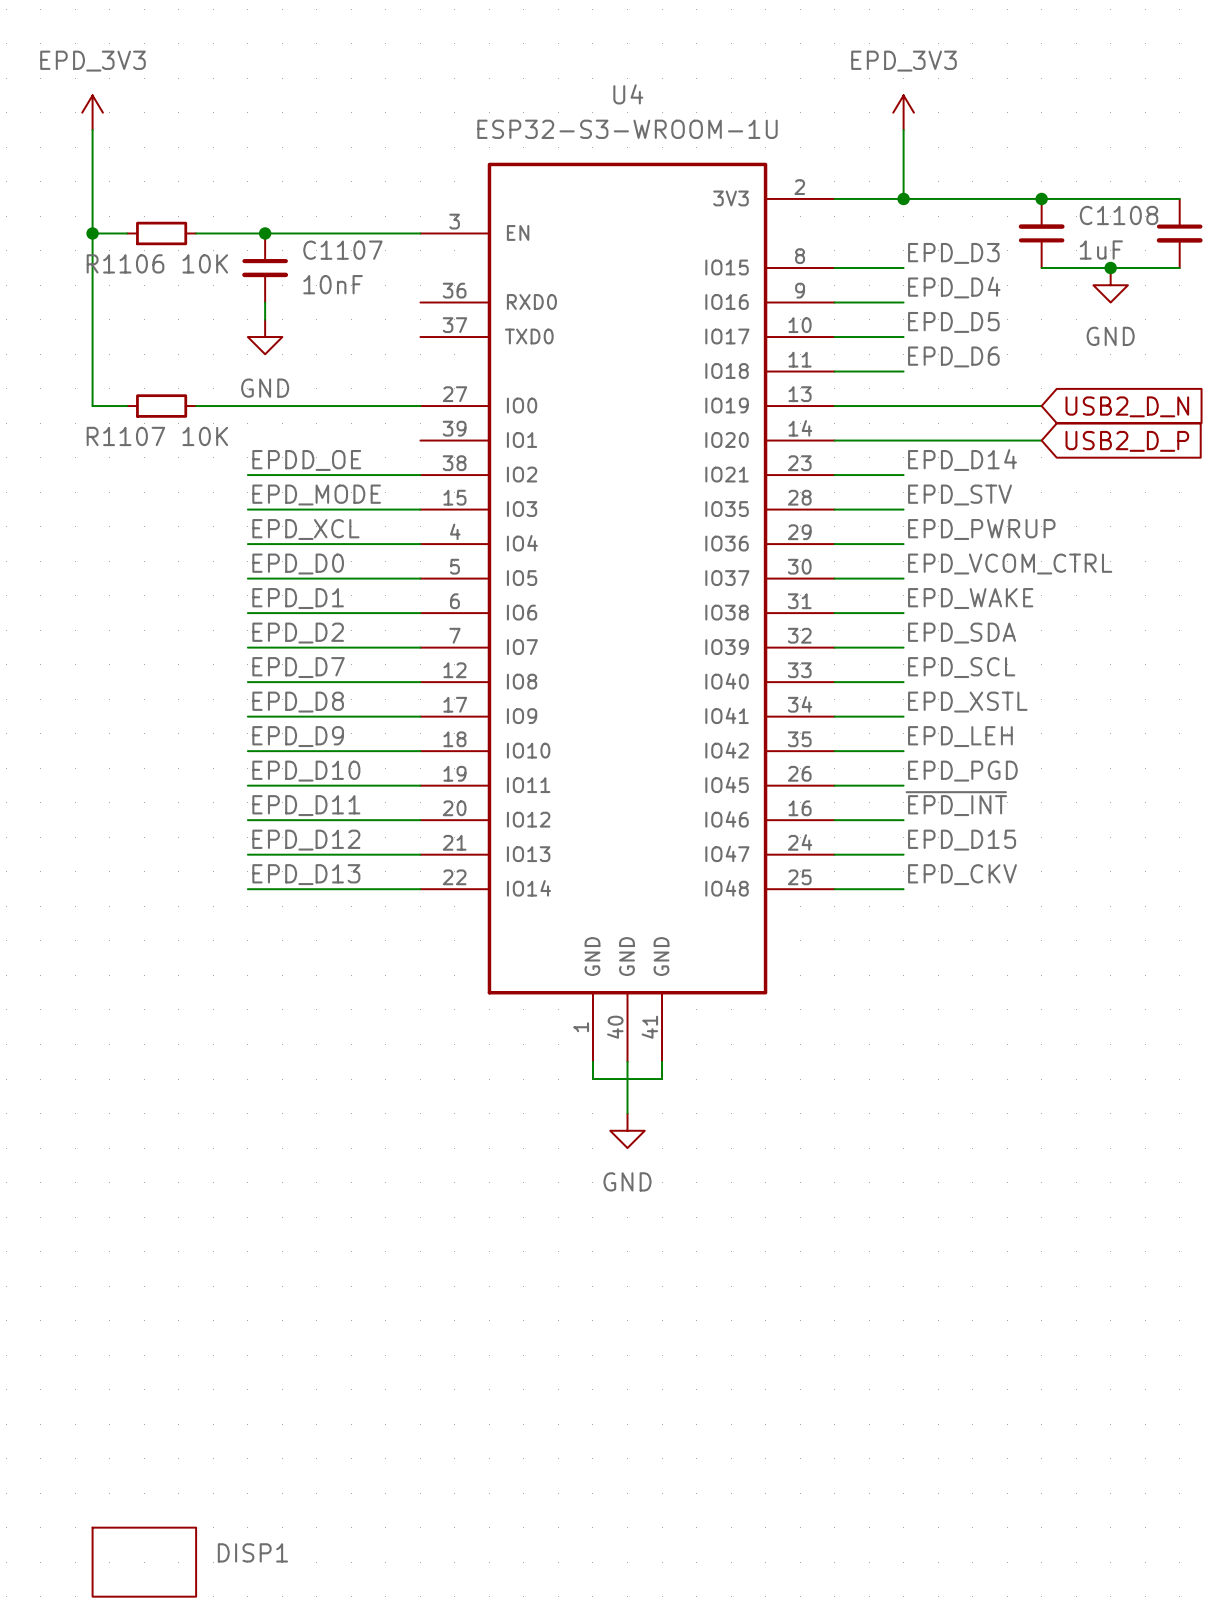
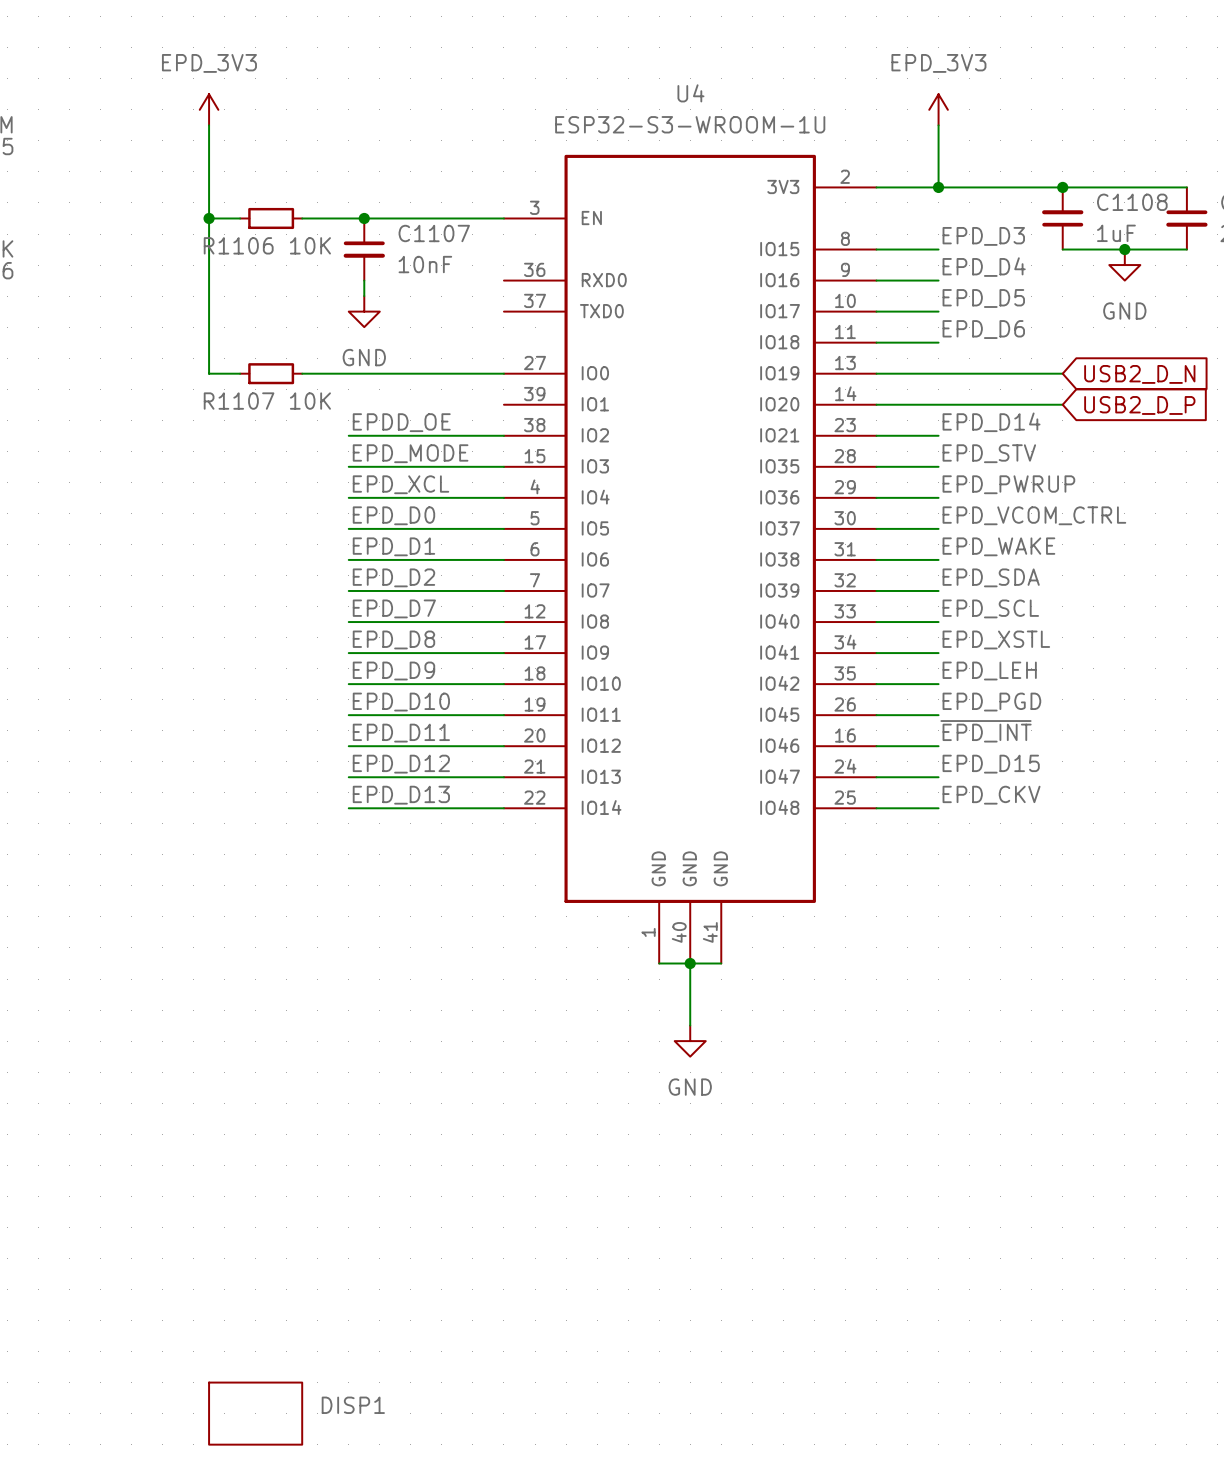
wire: (592, 1061) (592, 1079) (662, 1079) (662, 1061) -> (659, 963) (721, 963)
junction: none -> (690, 963)
power symbol position: GND (627, 1130) -> GND (690, 1041)

